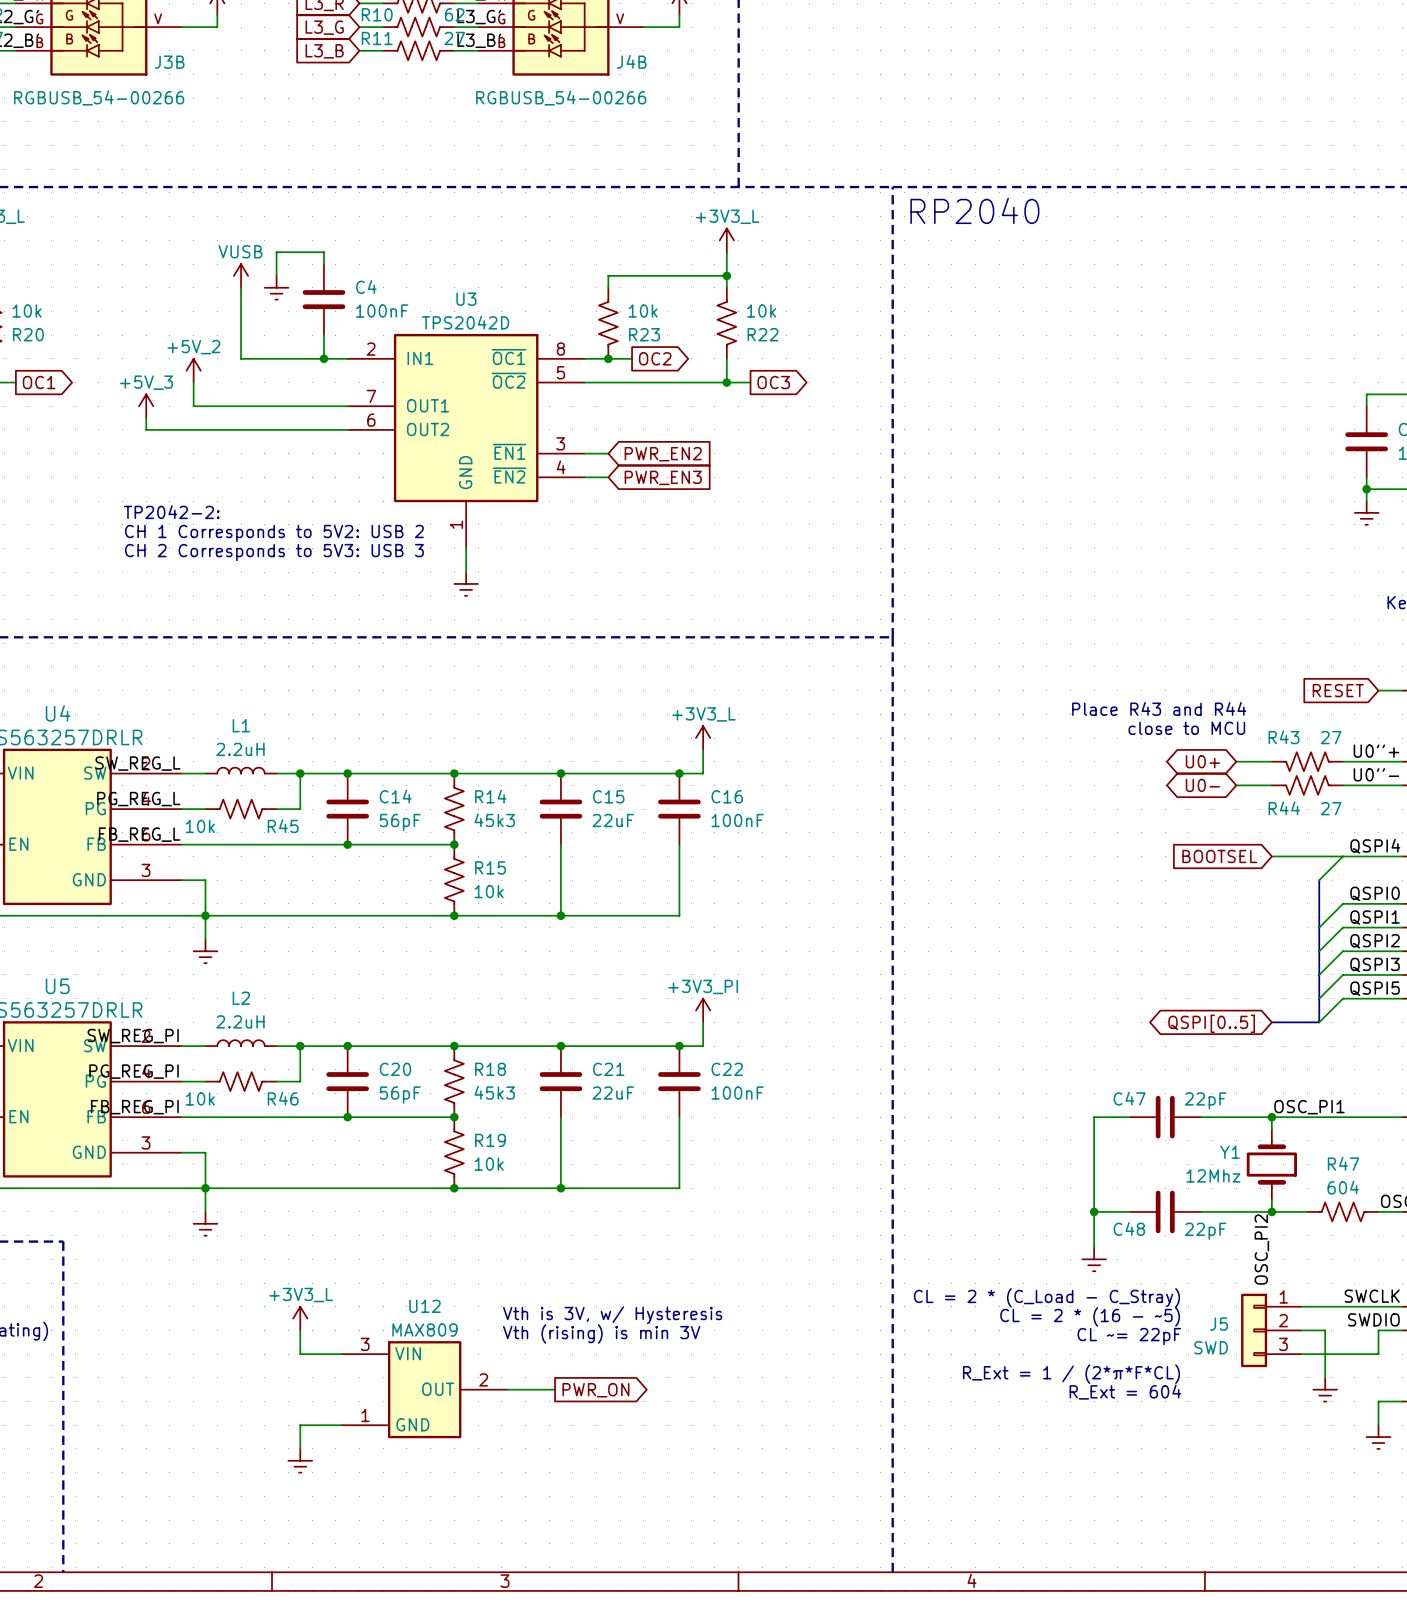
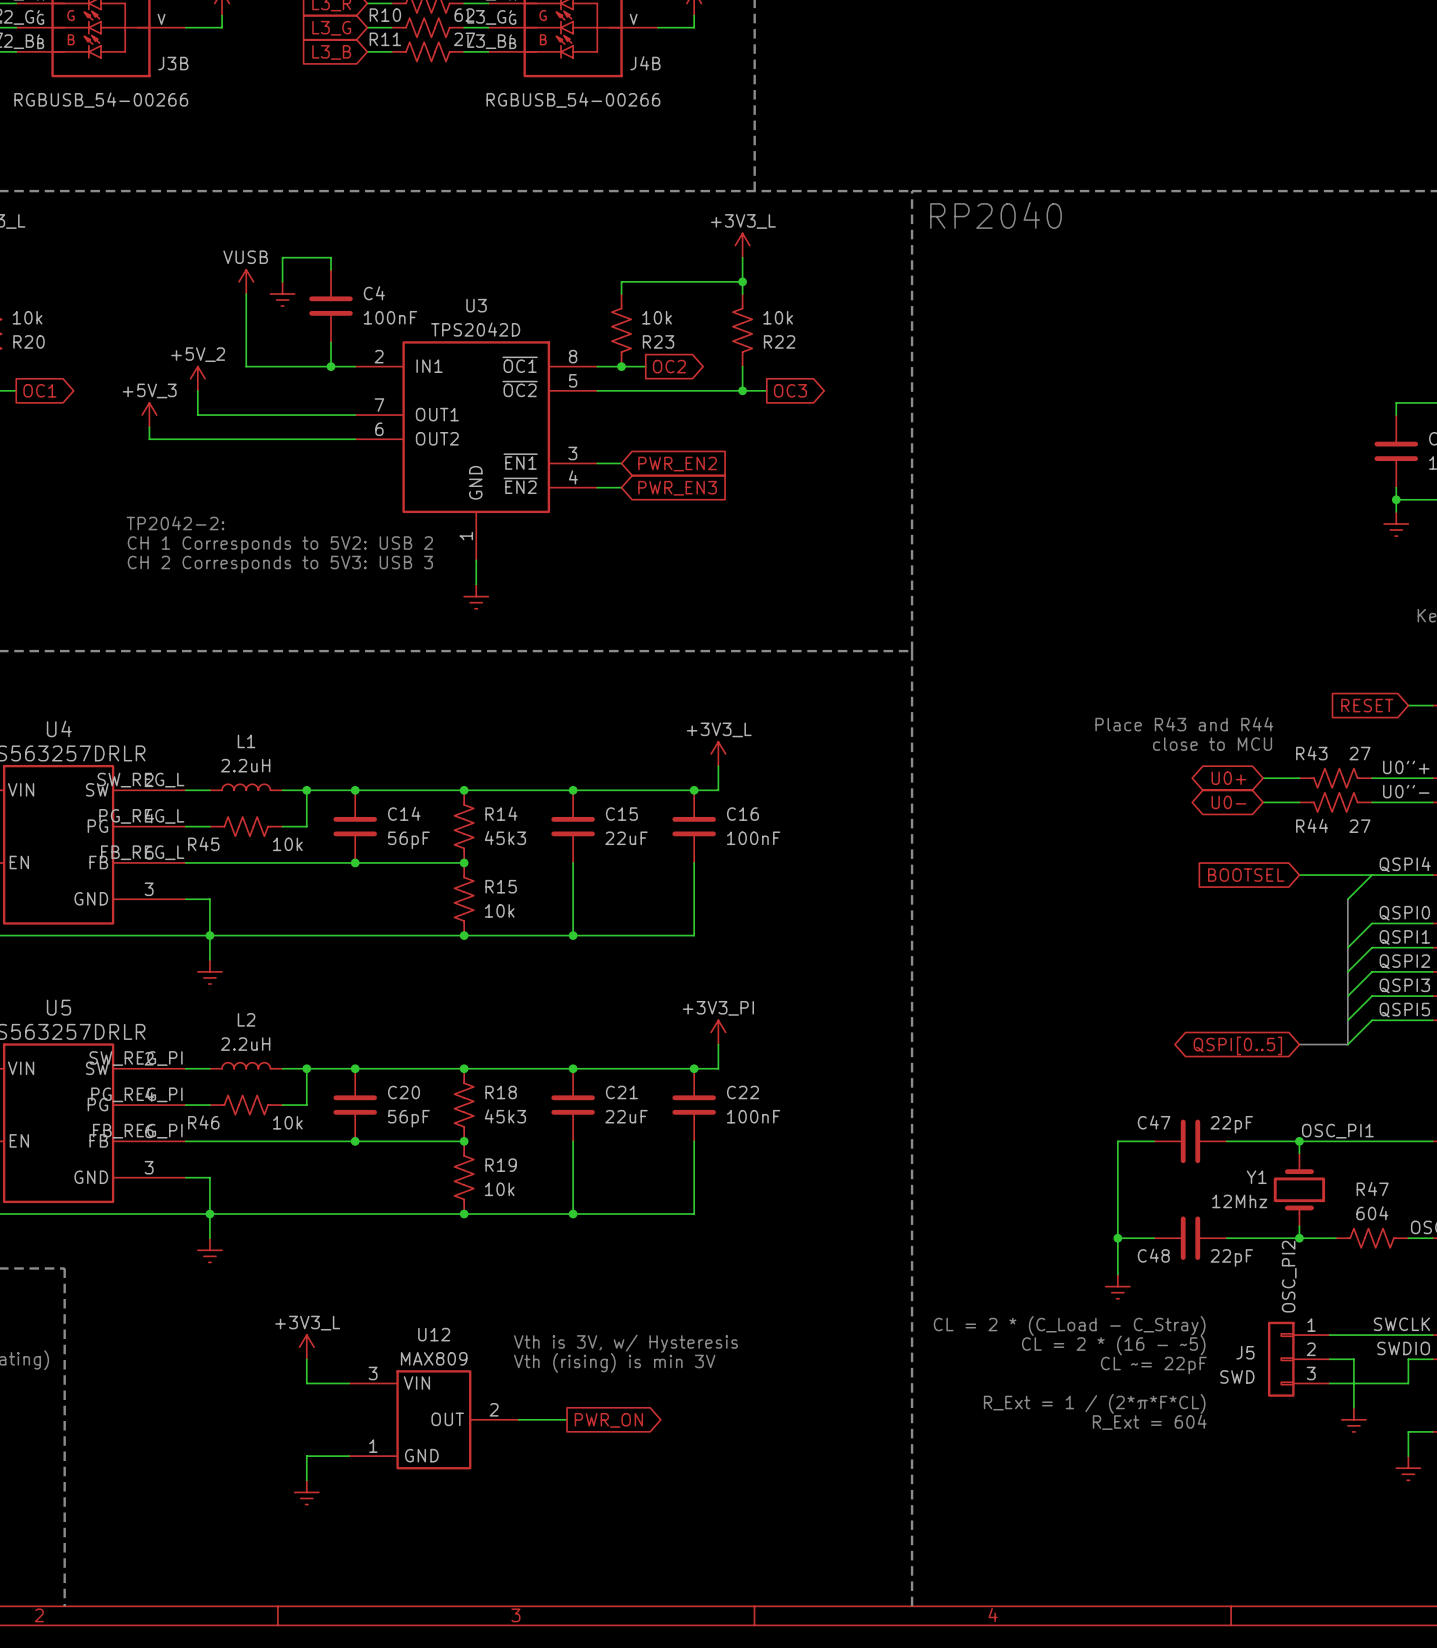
R45 value position: 10k (200, 826) -> 10k (287, 844)
R45 name position: R45 (283, 826) -> R45 (203, 844)
R46 value position: 10k (200, 1098) -> 10k (287, 1122)
R46 name position: R46 (283, 1098) -> R46 (203, 1122)

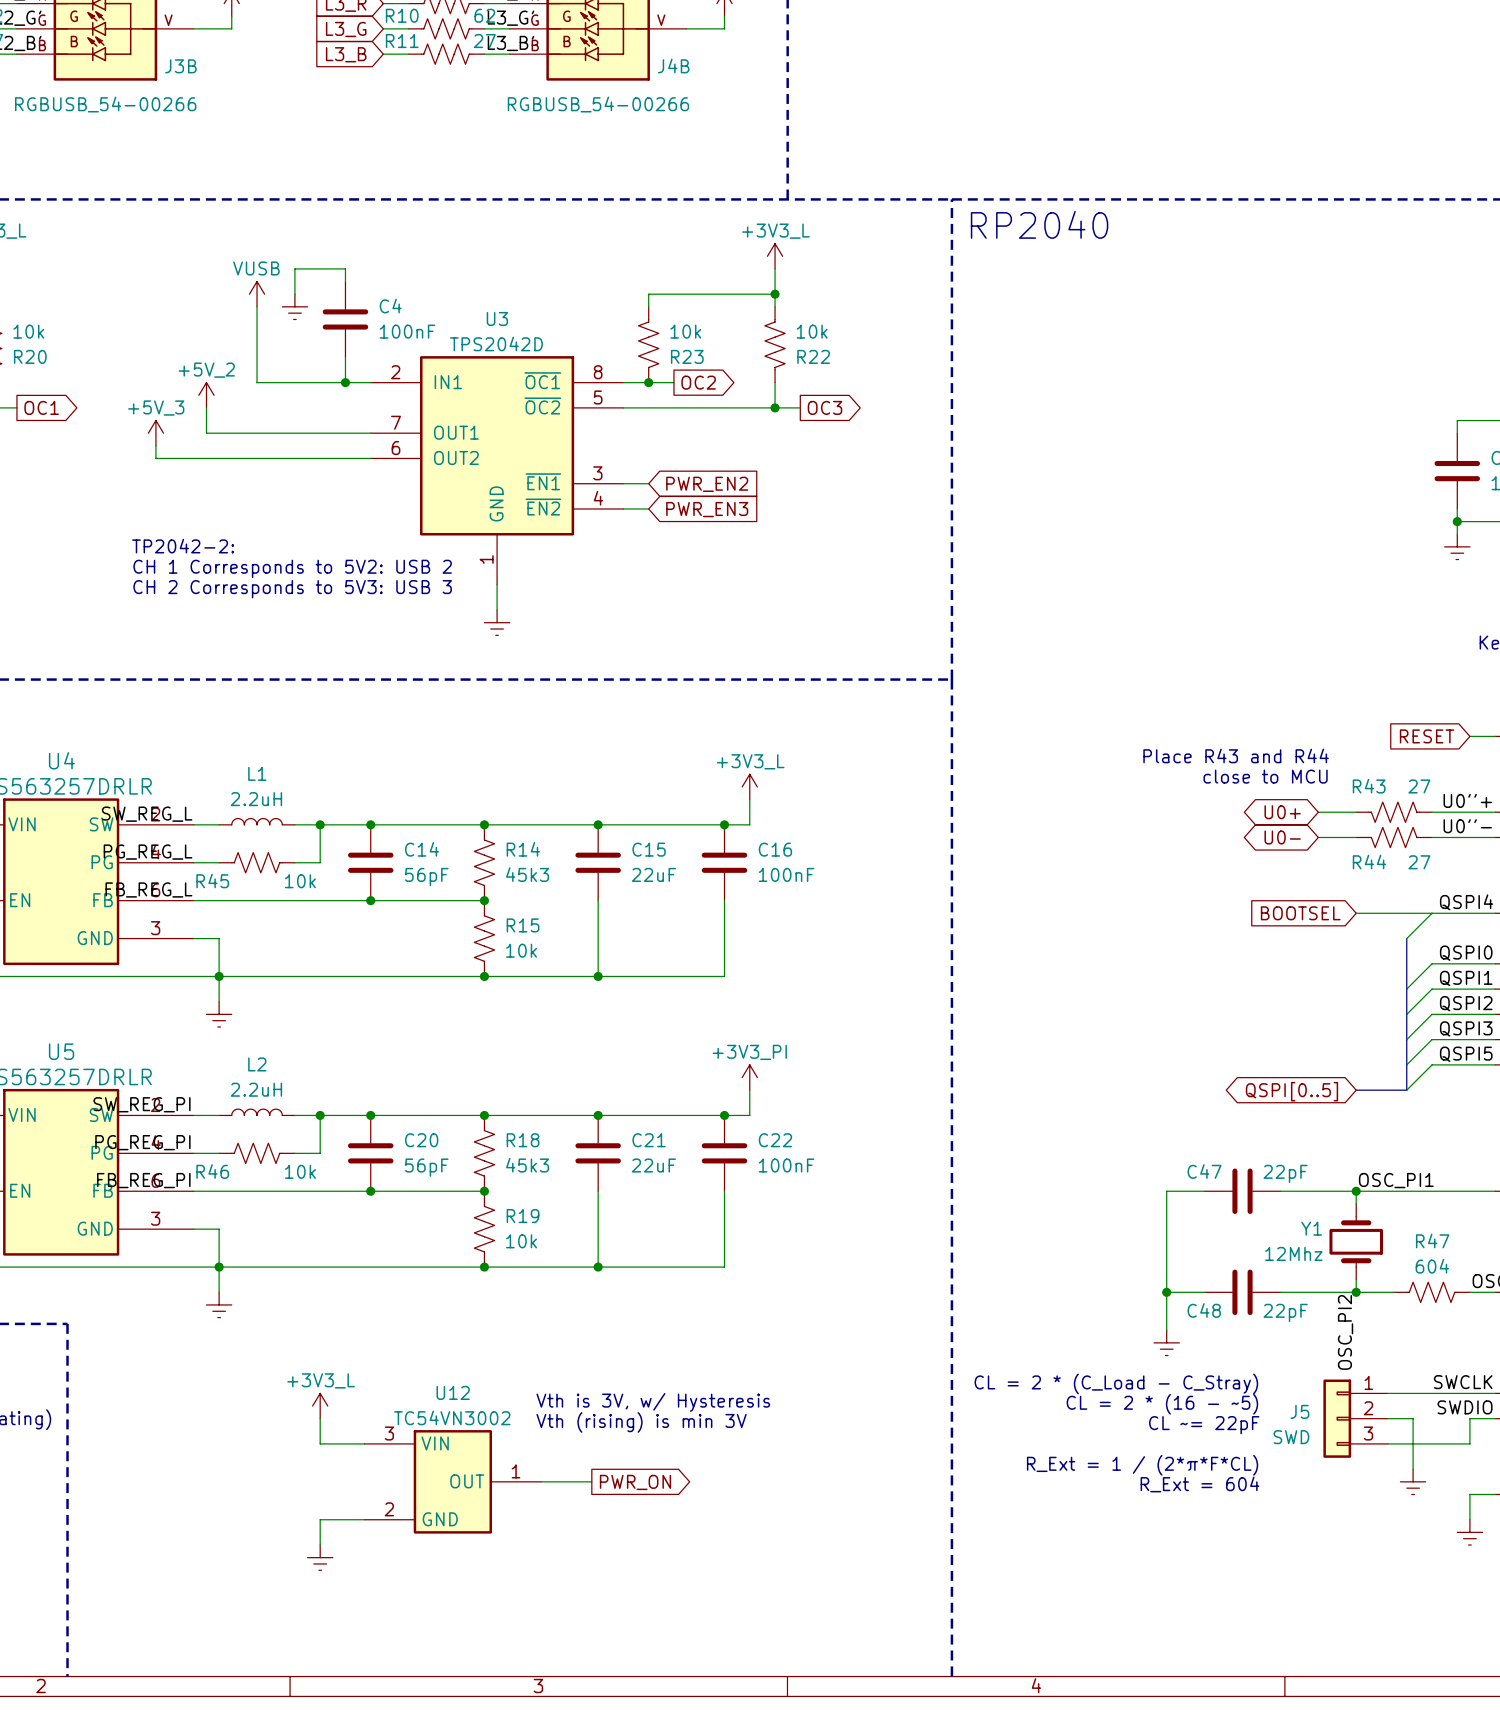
U12 value: MAX809 (434, 1358) -> TC54VN3002 (452, 1417)
U12 pin number: 2 (494, 1409) -> 1 (516, 1471)
U12 pin number: 1 (373, 1446) -> 2 (389, 1509)

